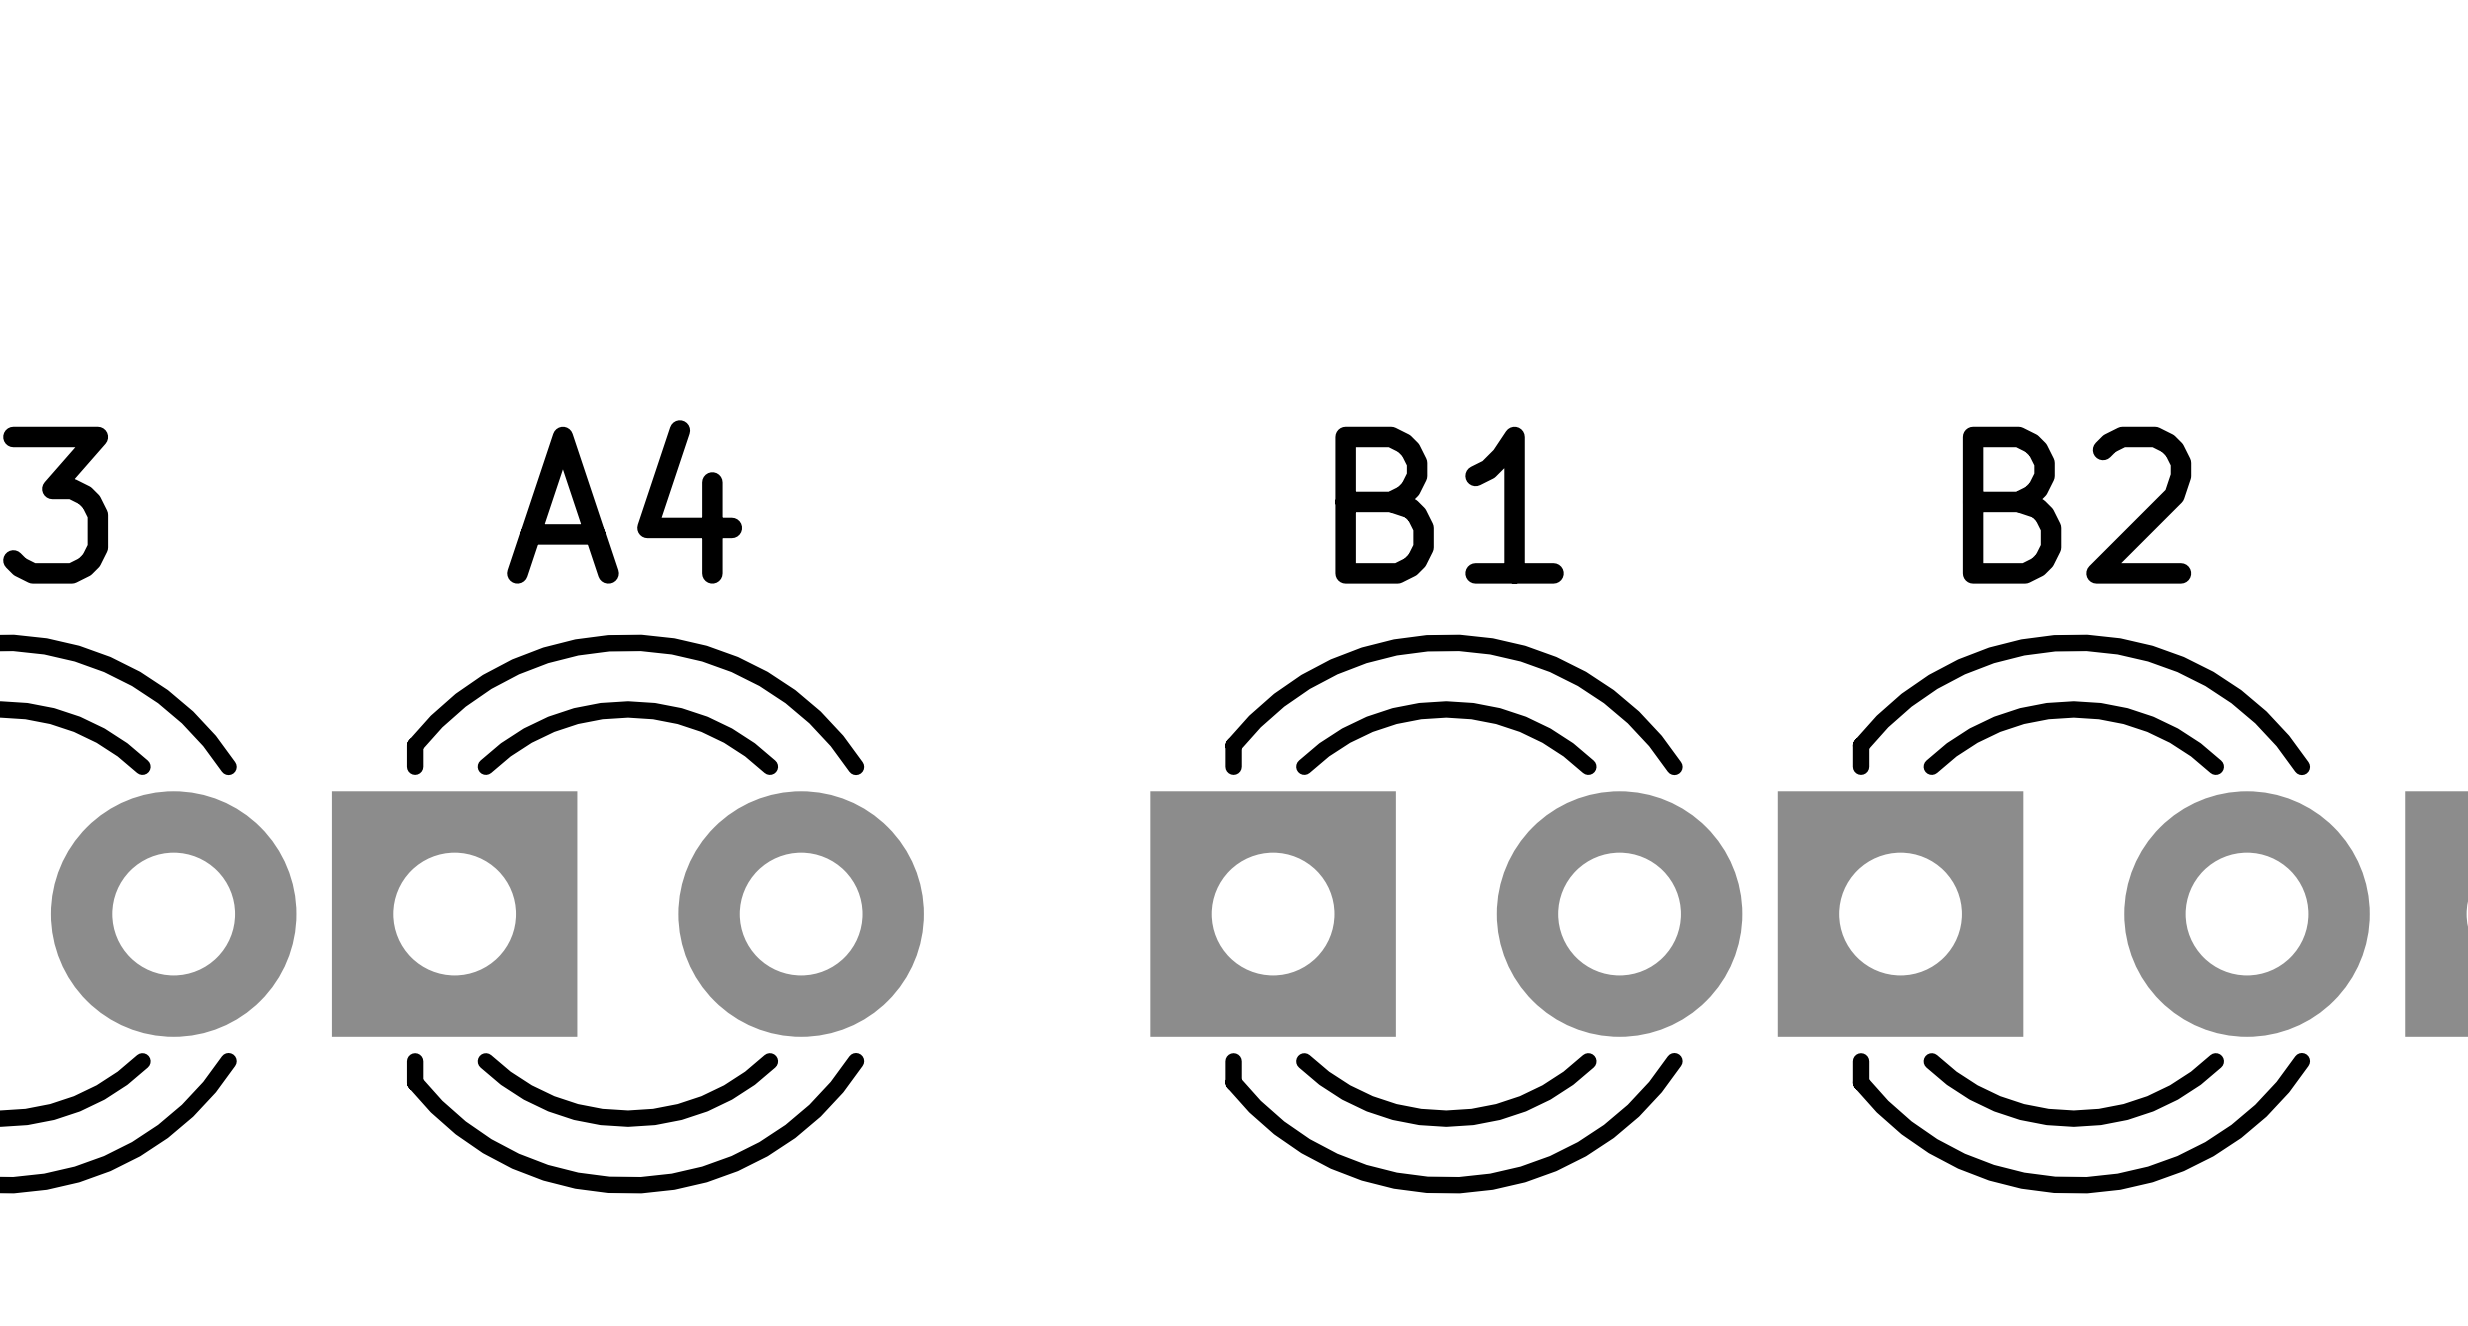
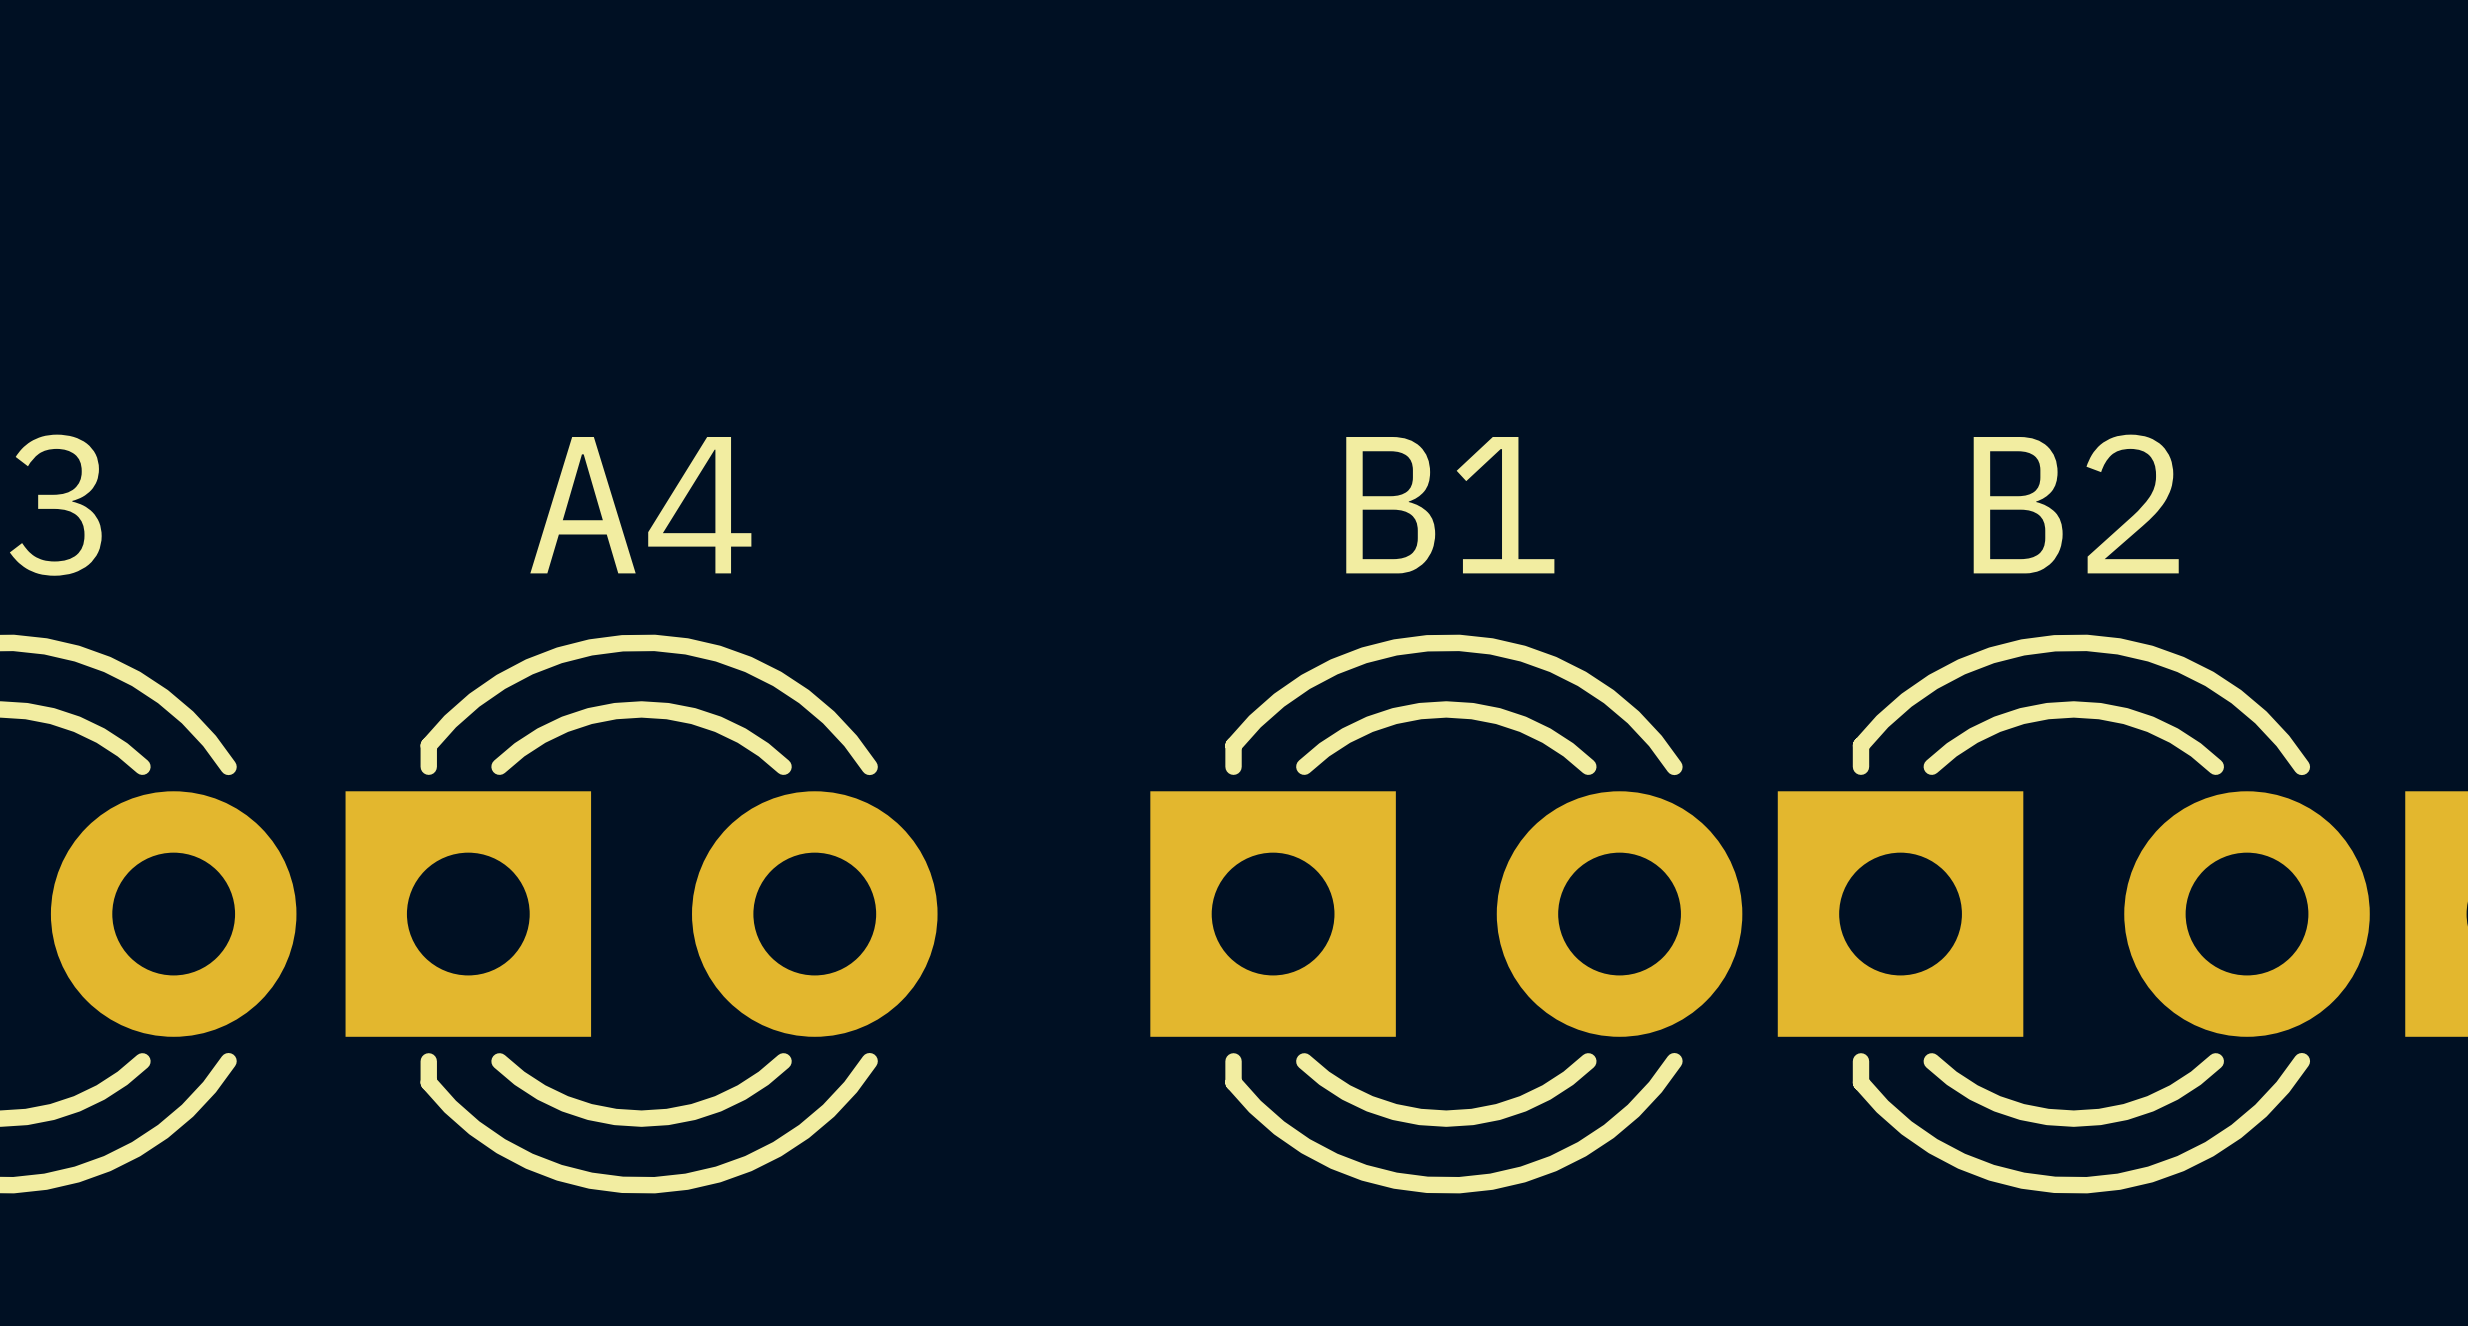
A4 position: (627, 914) -> (641, 914)

